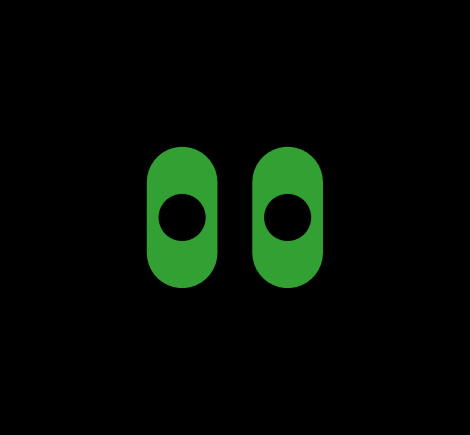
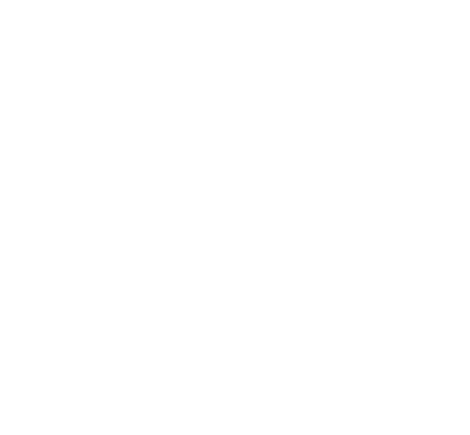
part: (234, 217) -> none

